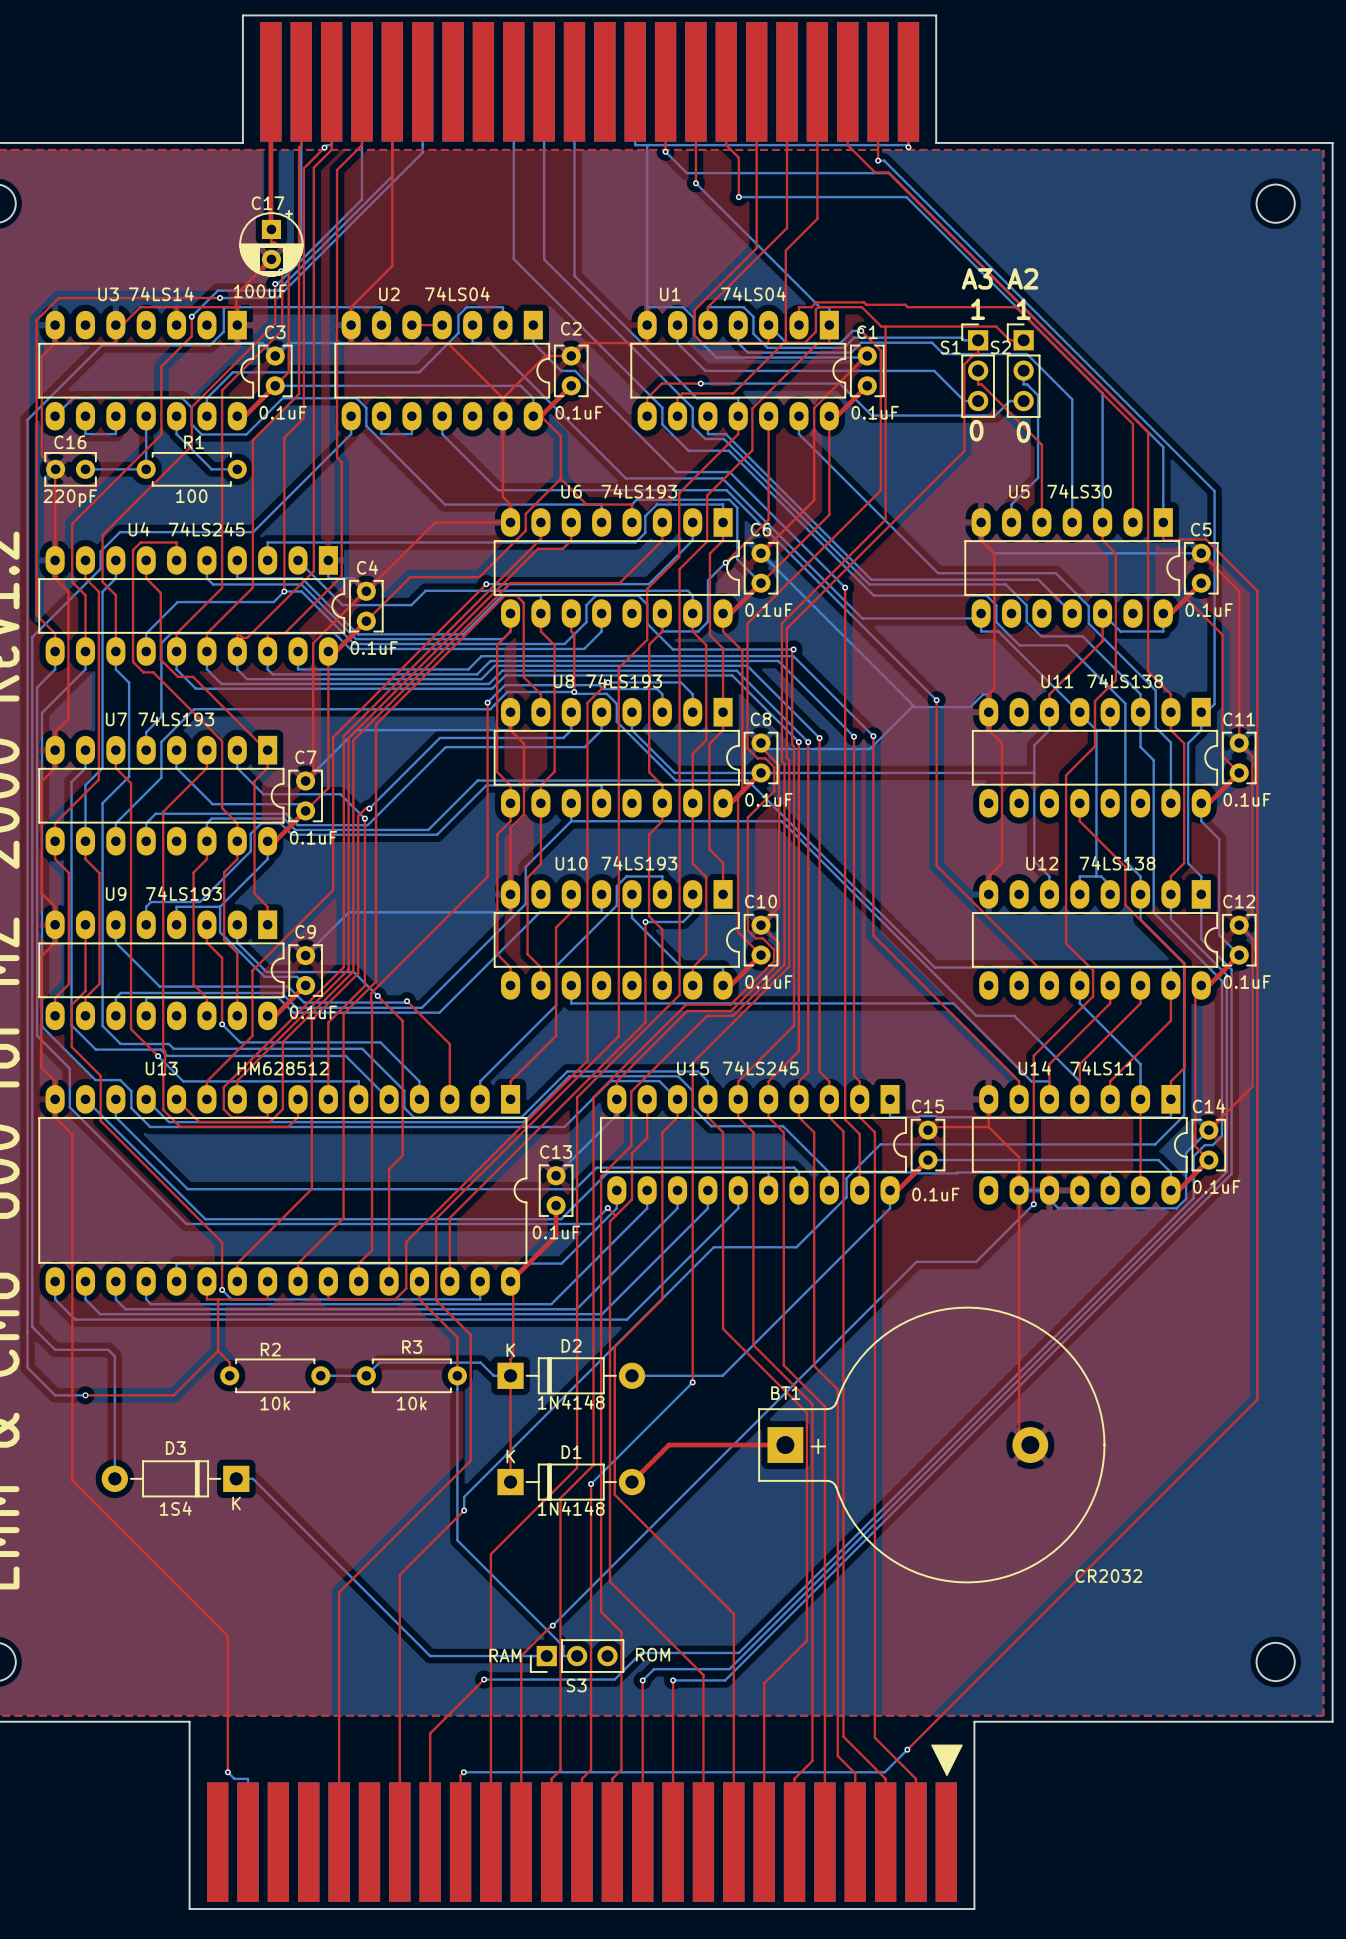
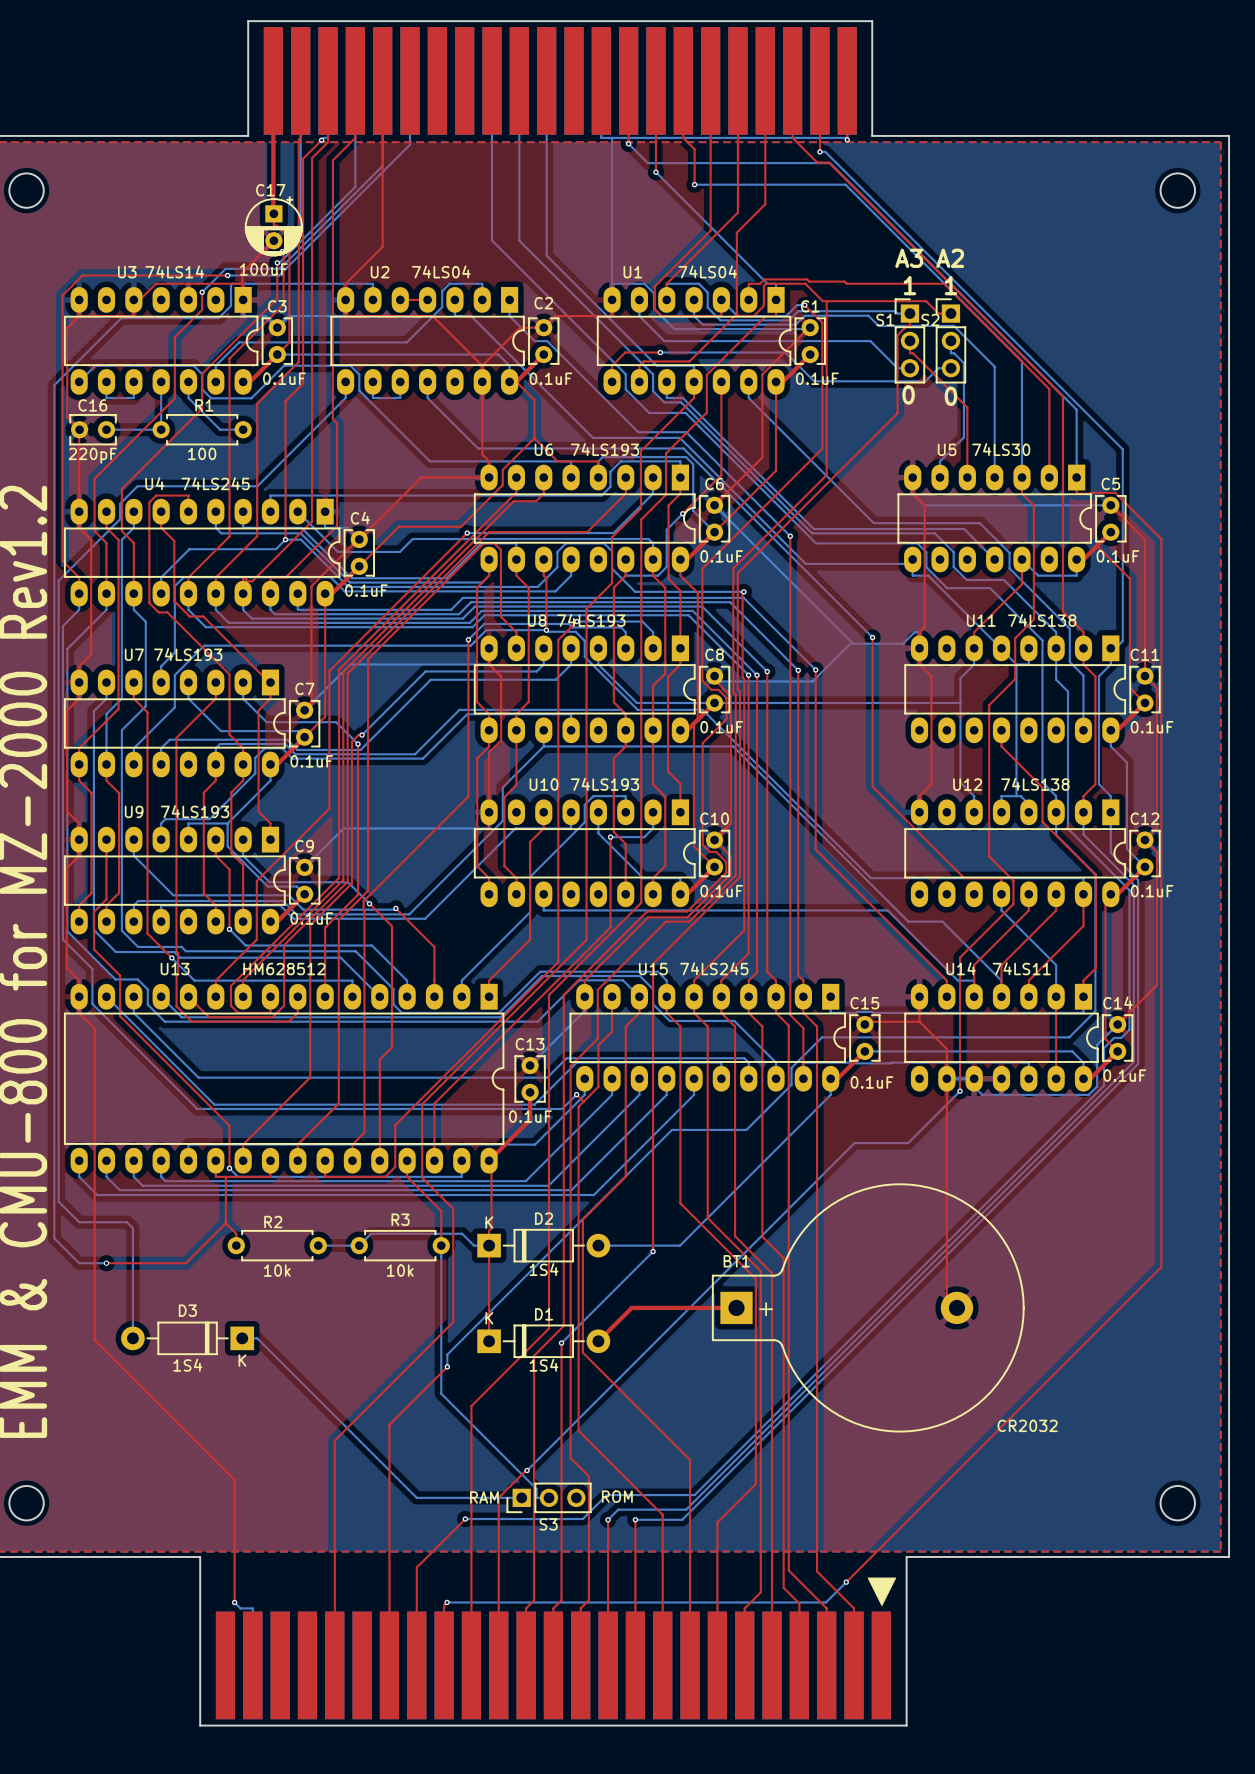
text: 1N4148 (571, 1402) -> 1S4 (544, 1269)
text: 1N4148 (571, 1508) -> 1S4 (544, 1365)

